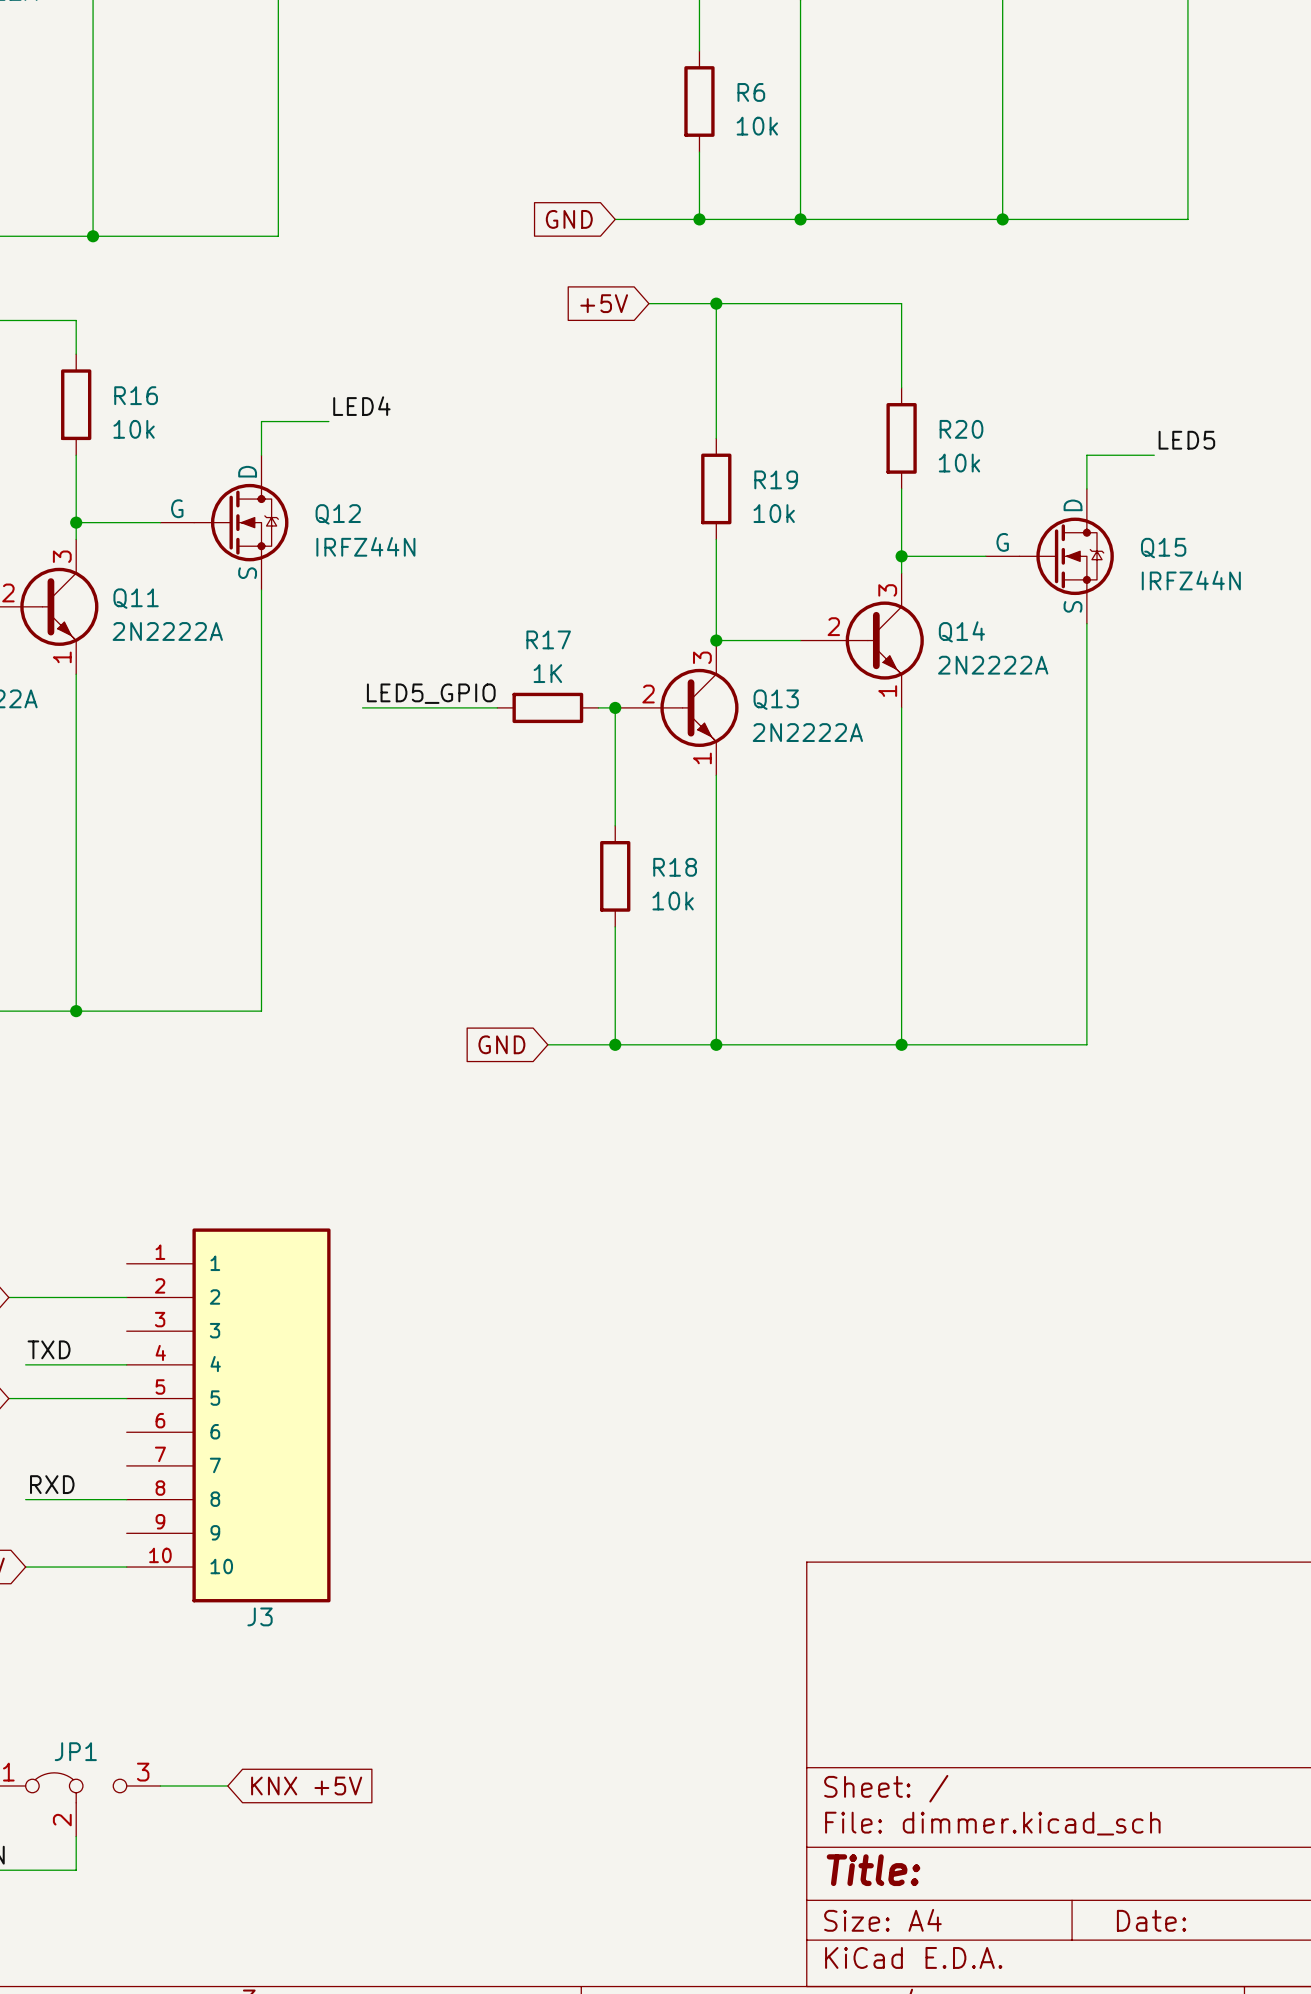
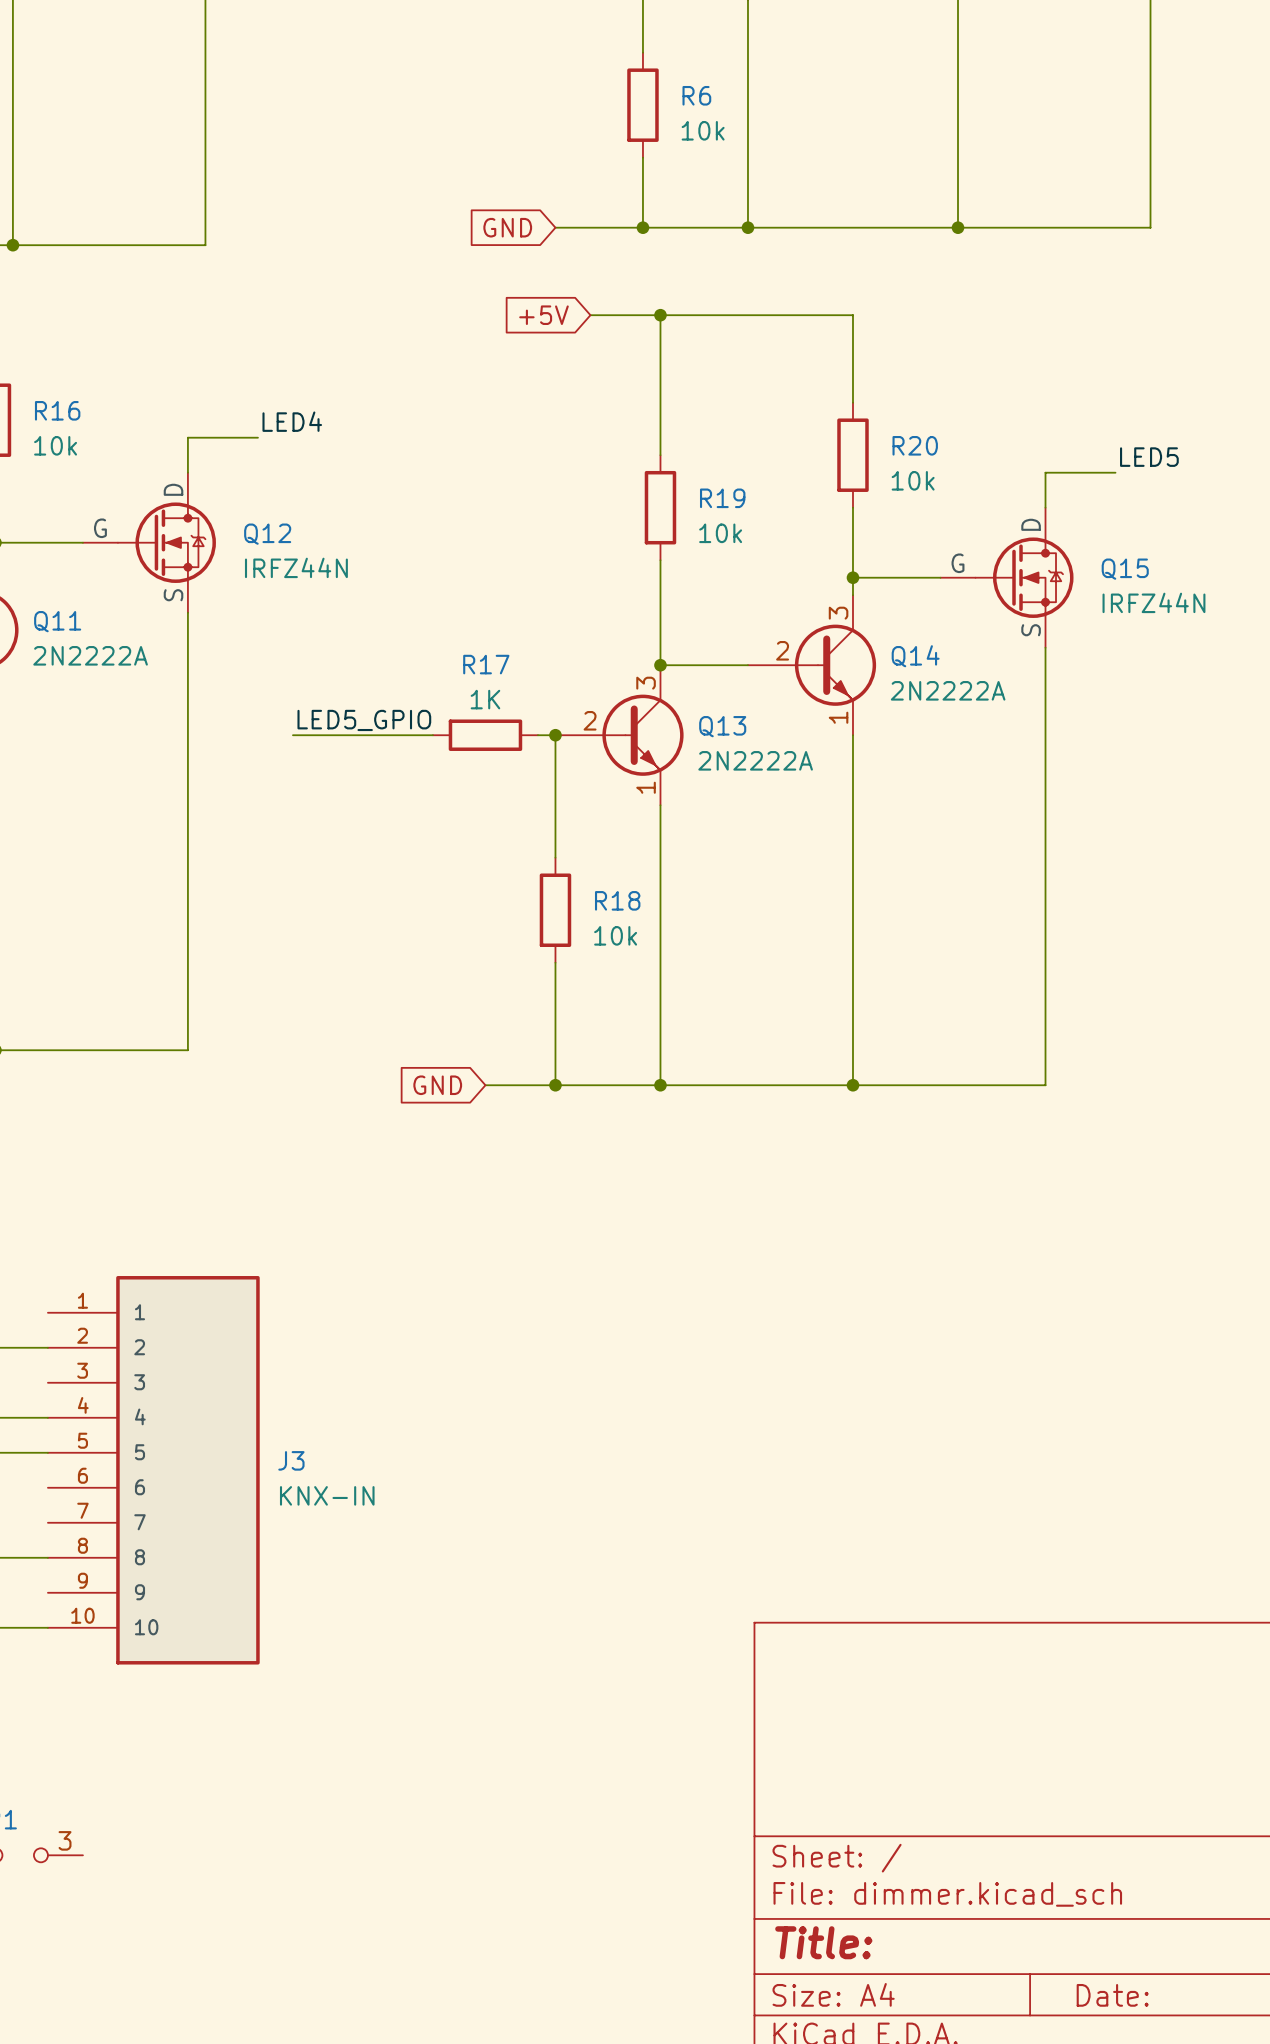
J3 value: none -> KNX-IN (327, 1495)
J3 name position: J3 (260, 1616) -> J3 (291, 1460)
wire: (160, 1785) (227, 1785) -> none
global label: KNX +5V (306, 1785) -> none

